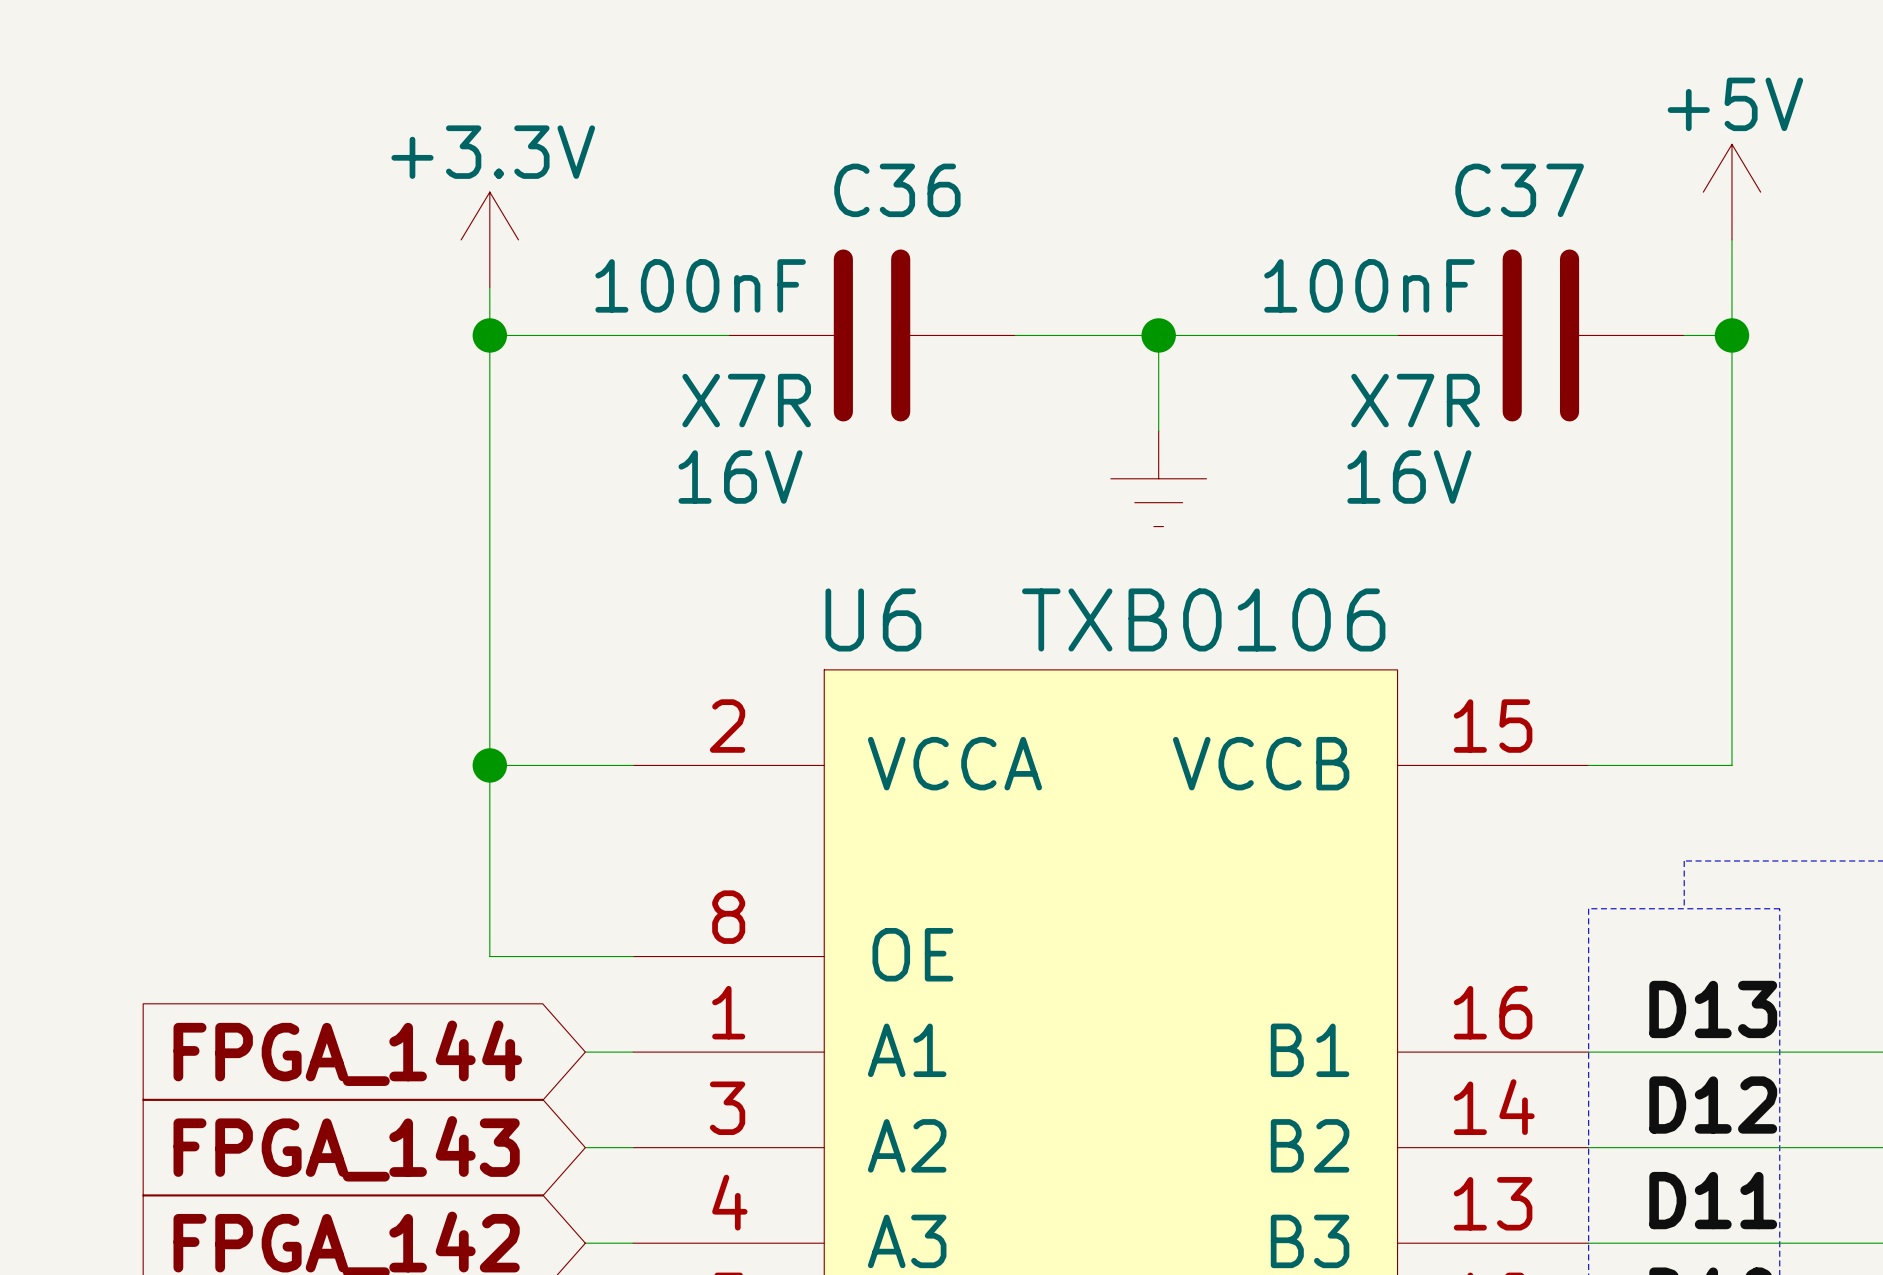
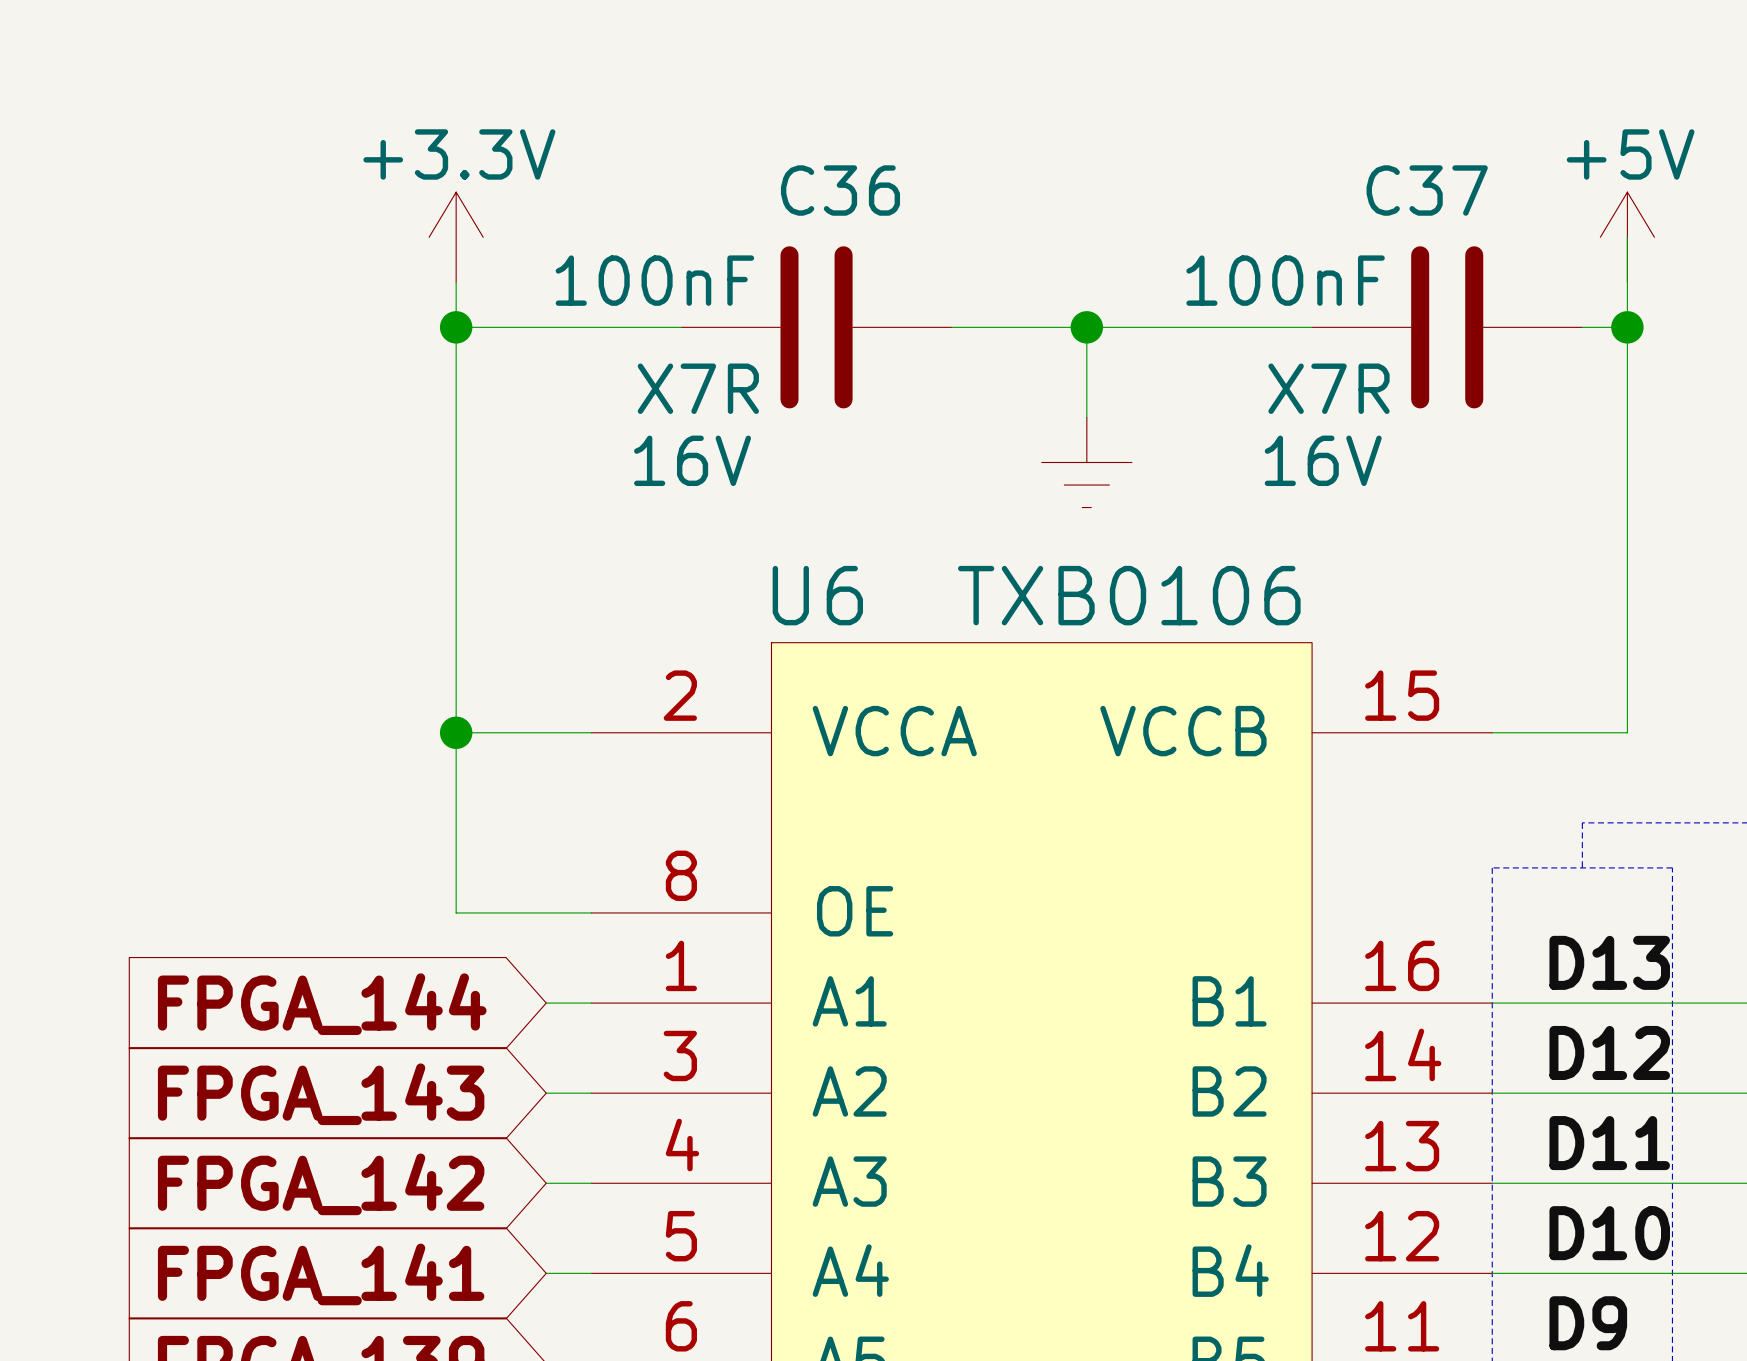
power symbol position: +5V (1731, 192) -> +5V (1627, 237)

